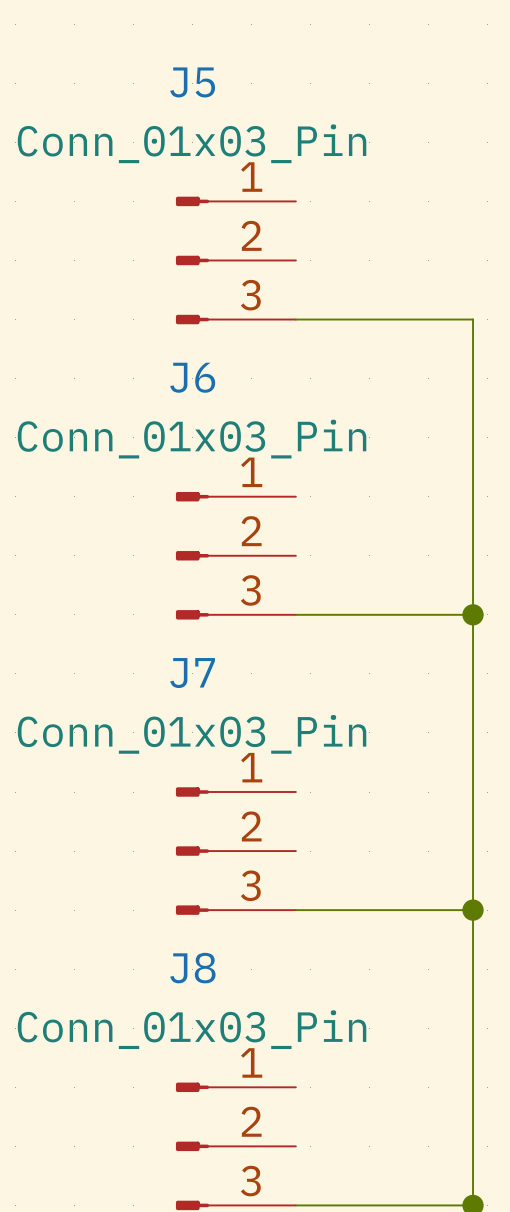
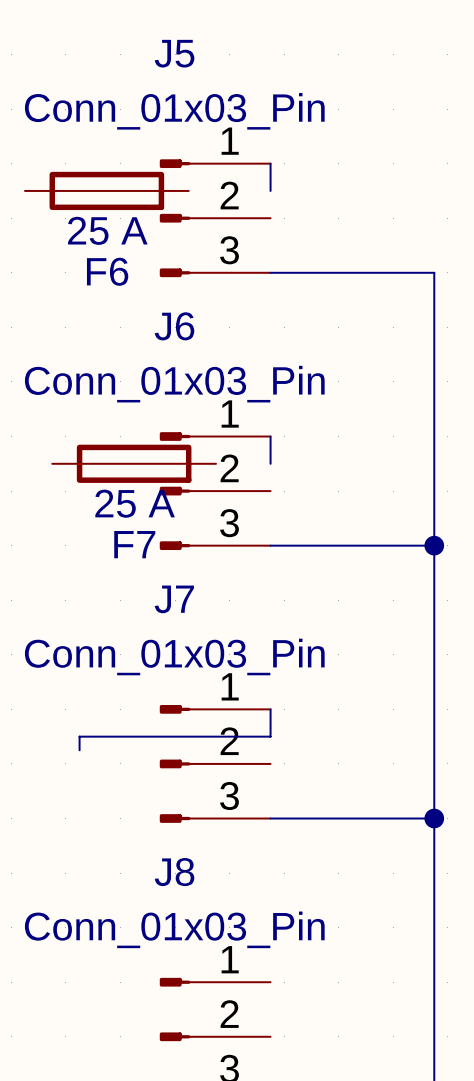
wire: none -> (270, 163) (270, 190)
F6: none -> 25 A (106, 190)
wire: none -> (270, 436) (270, 463)
F7: none -> 25 A (134, 463)
wire: none -> (270, 709) (270, 736) (79, 736) (79, 750)

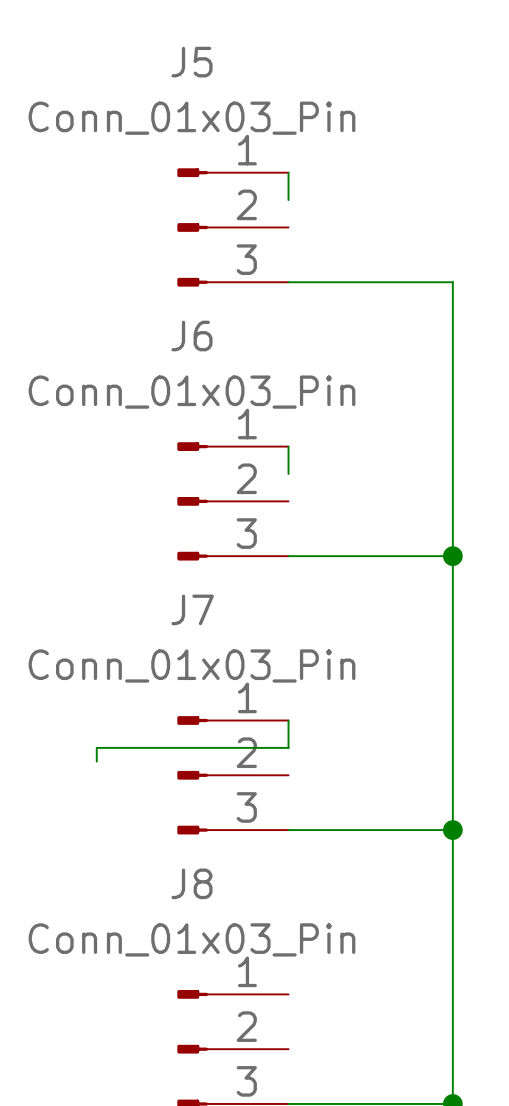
F6: 25 A (106, 190) -> none
F7: 25 A (134, 463) -> none

